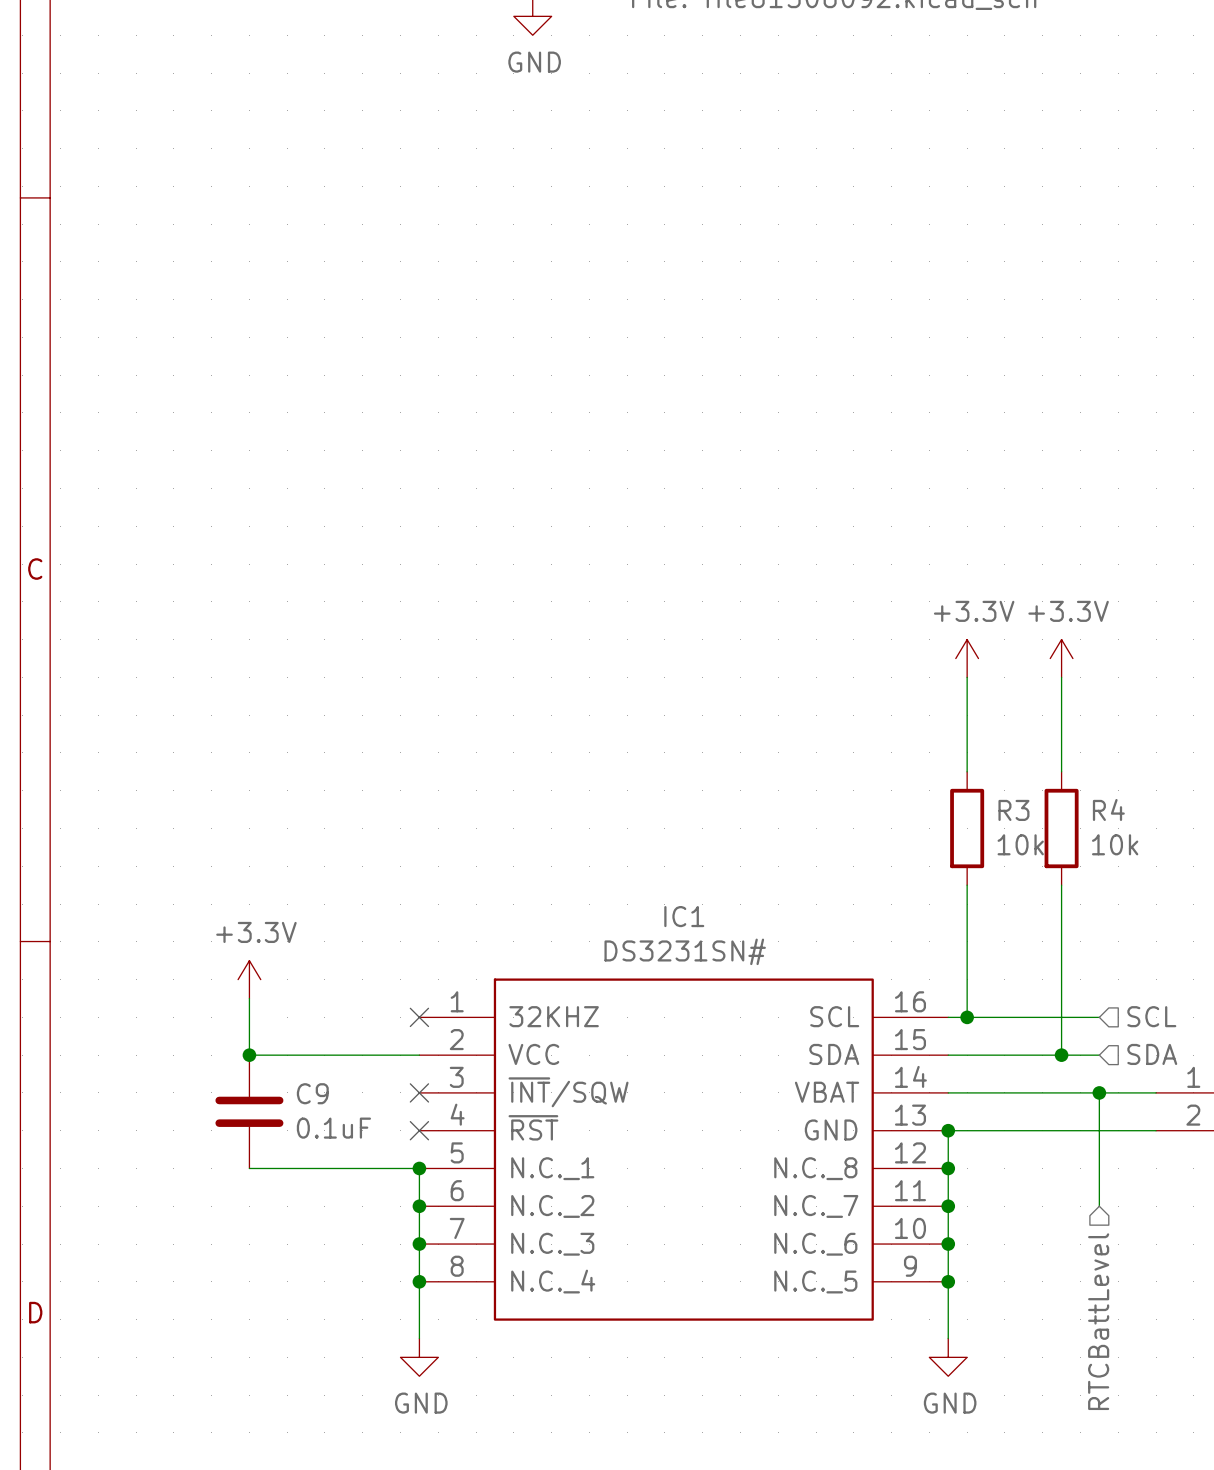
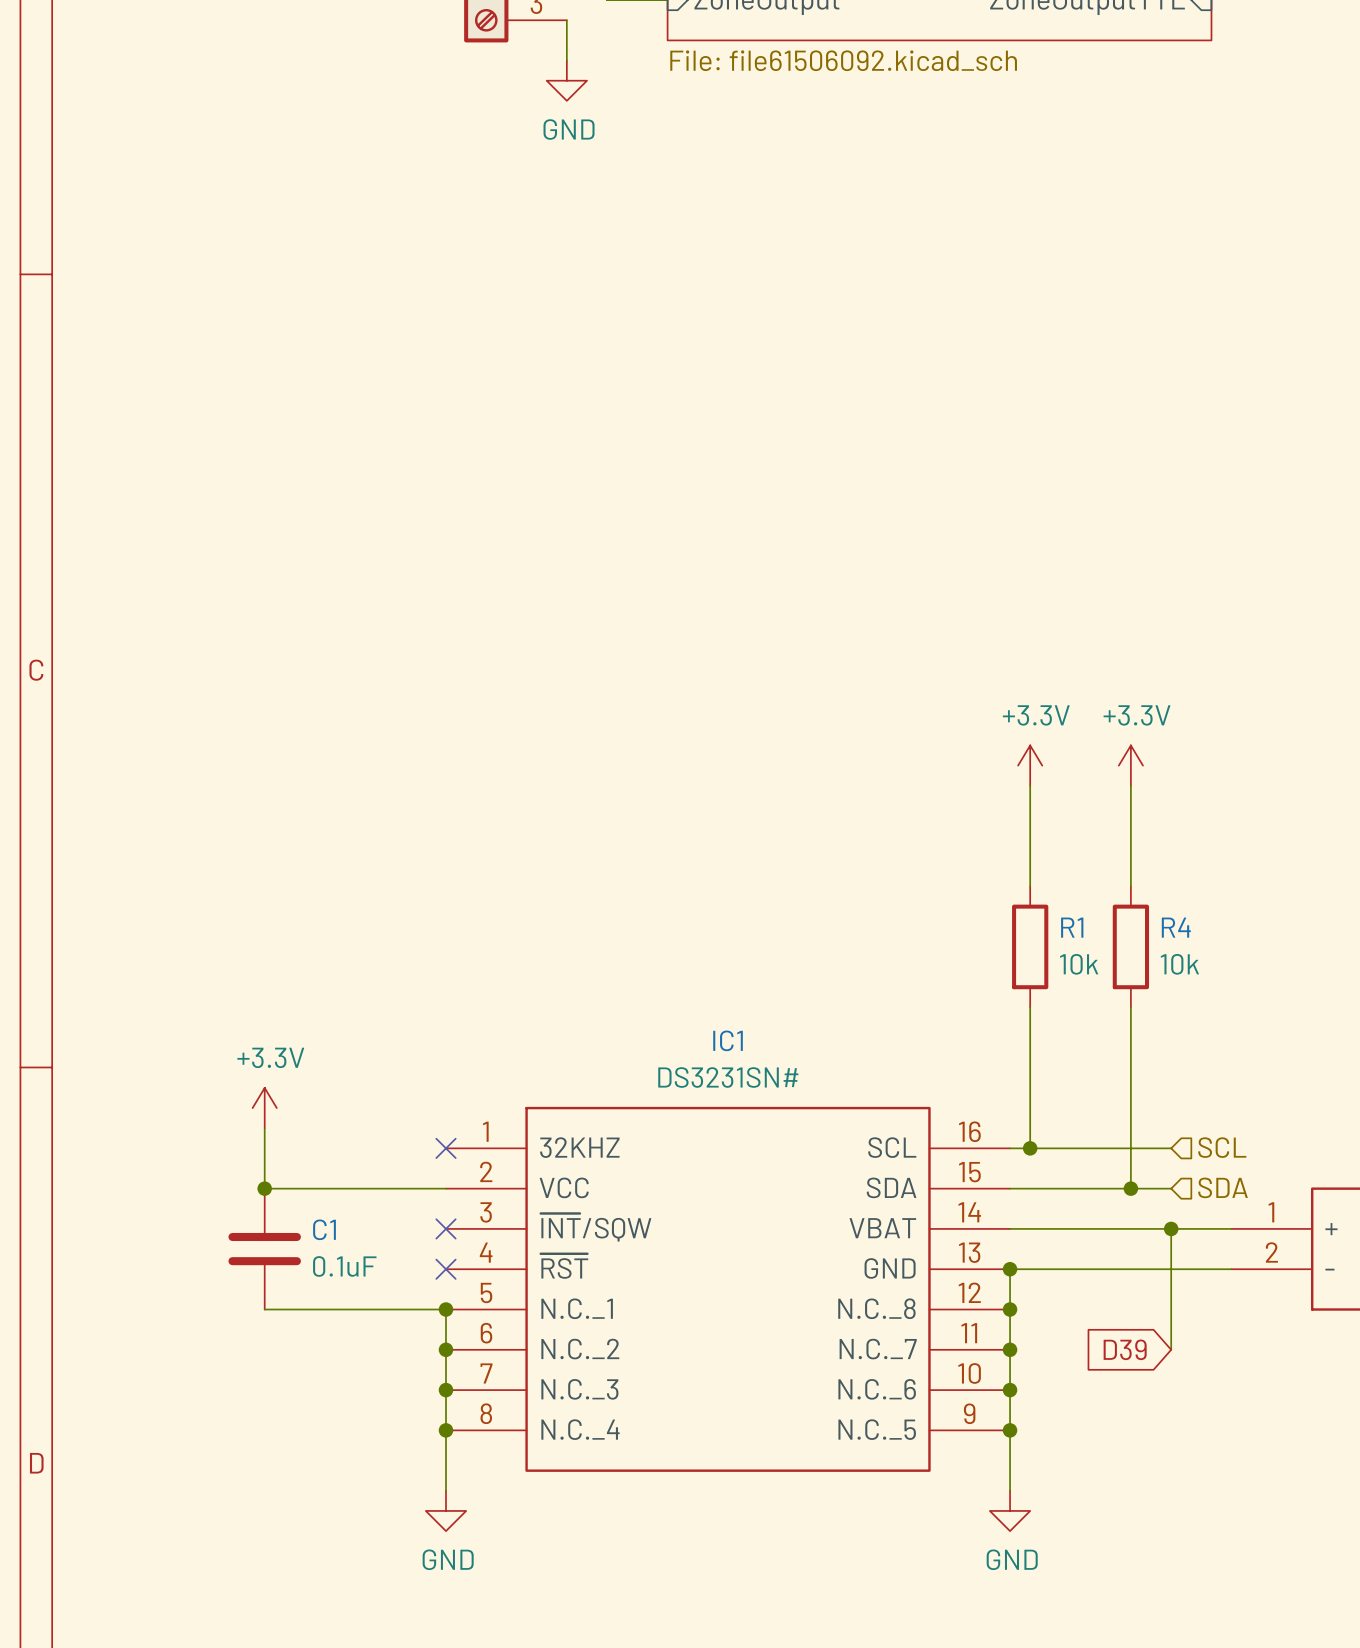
R3 name: R3 (1013, 810) -> R1 (1072, 927)
C9 name: C9 (312, 1093) -> C1 (324, 1229)
global label: none -> D39 (1125, 1349)
hierarchical label: RTCBattLevel (1098, 1321) -> none

